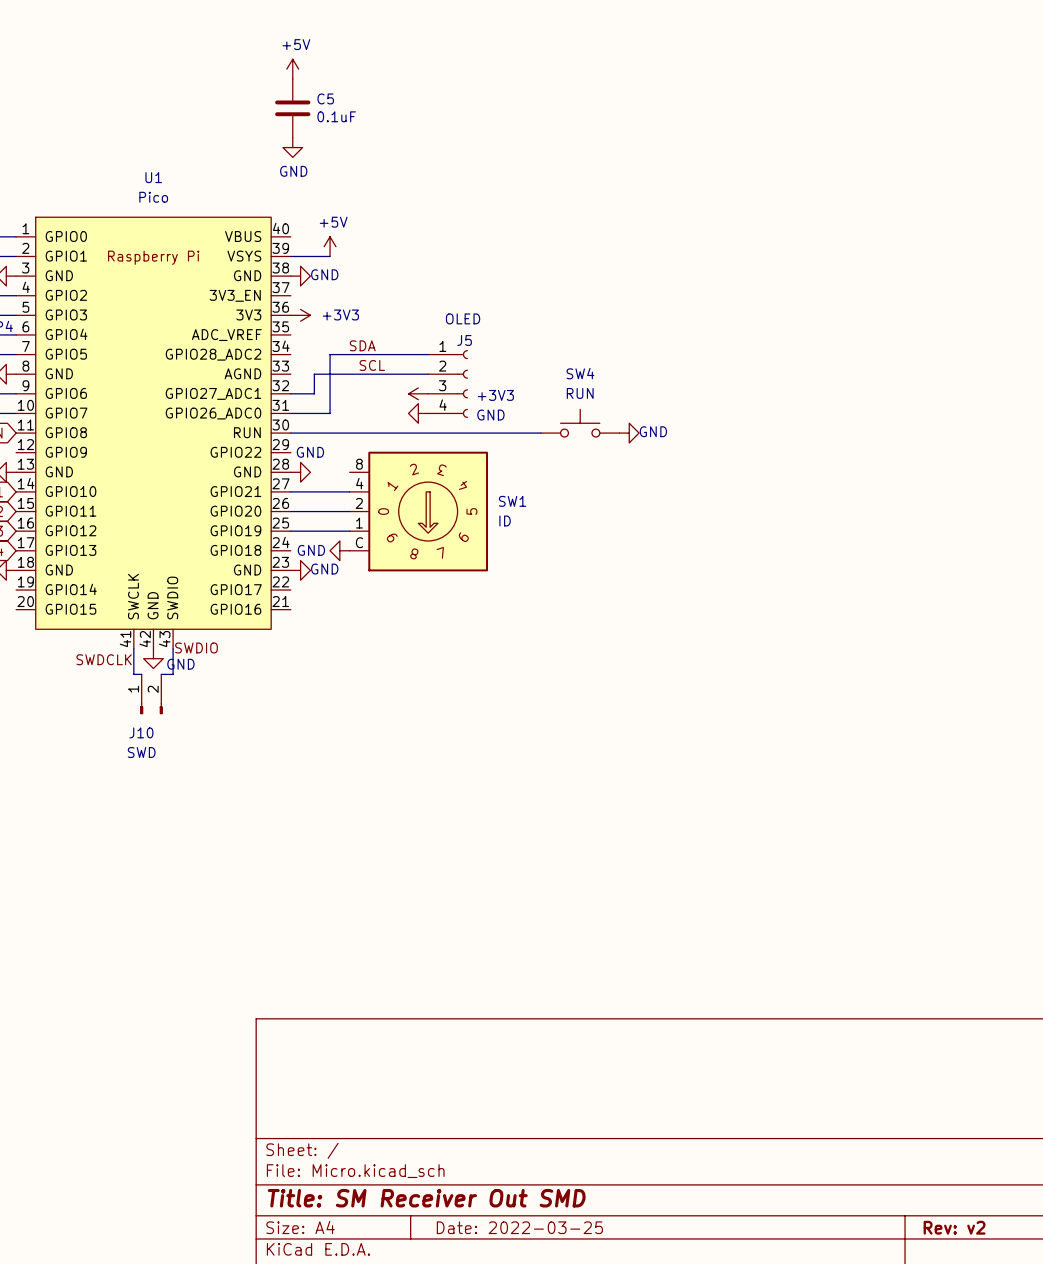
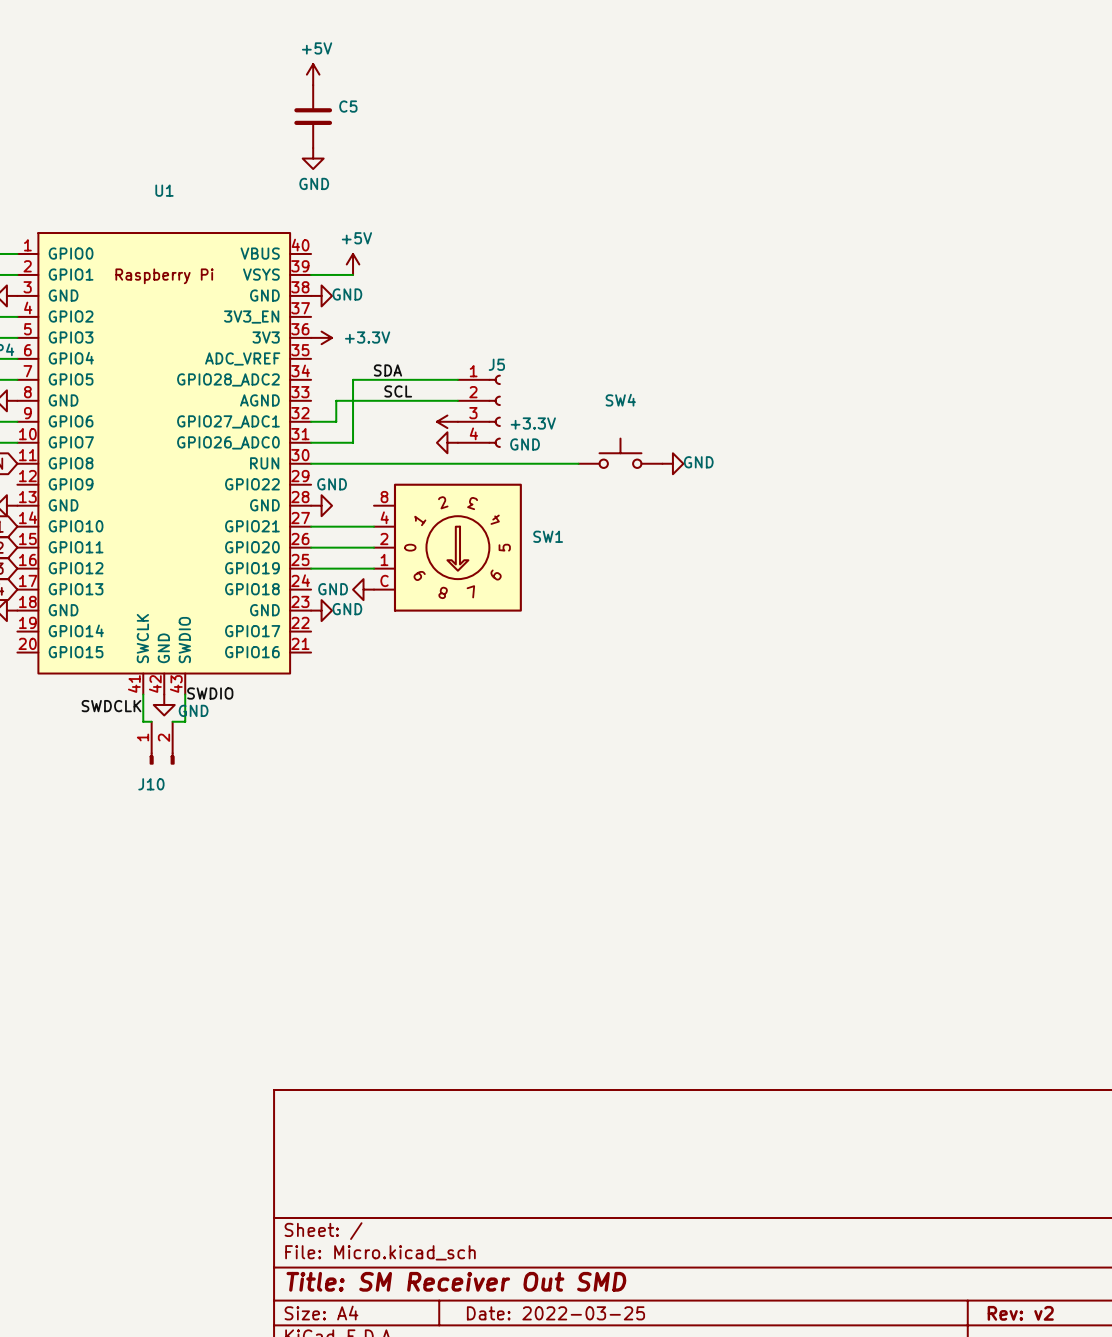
C5 value: 0.1uF (336, 116) -> none
U1 value: Pico (153, 197) -> none
power symbol: +3V3 (300, 315) -> +3.3V (321, 337)
J5 value: OLED (463, 318) -> none
power symbol: +3V3 (418, 393) -> +3.3V (447, 421)
SW4 value: RUN (580, 393) -> none
SW1 value: ID (505, 520) -> none
J10 value: SWD (141, 752) -> none

